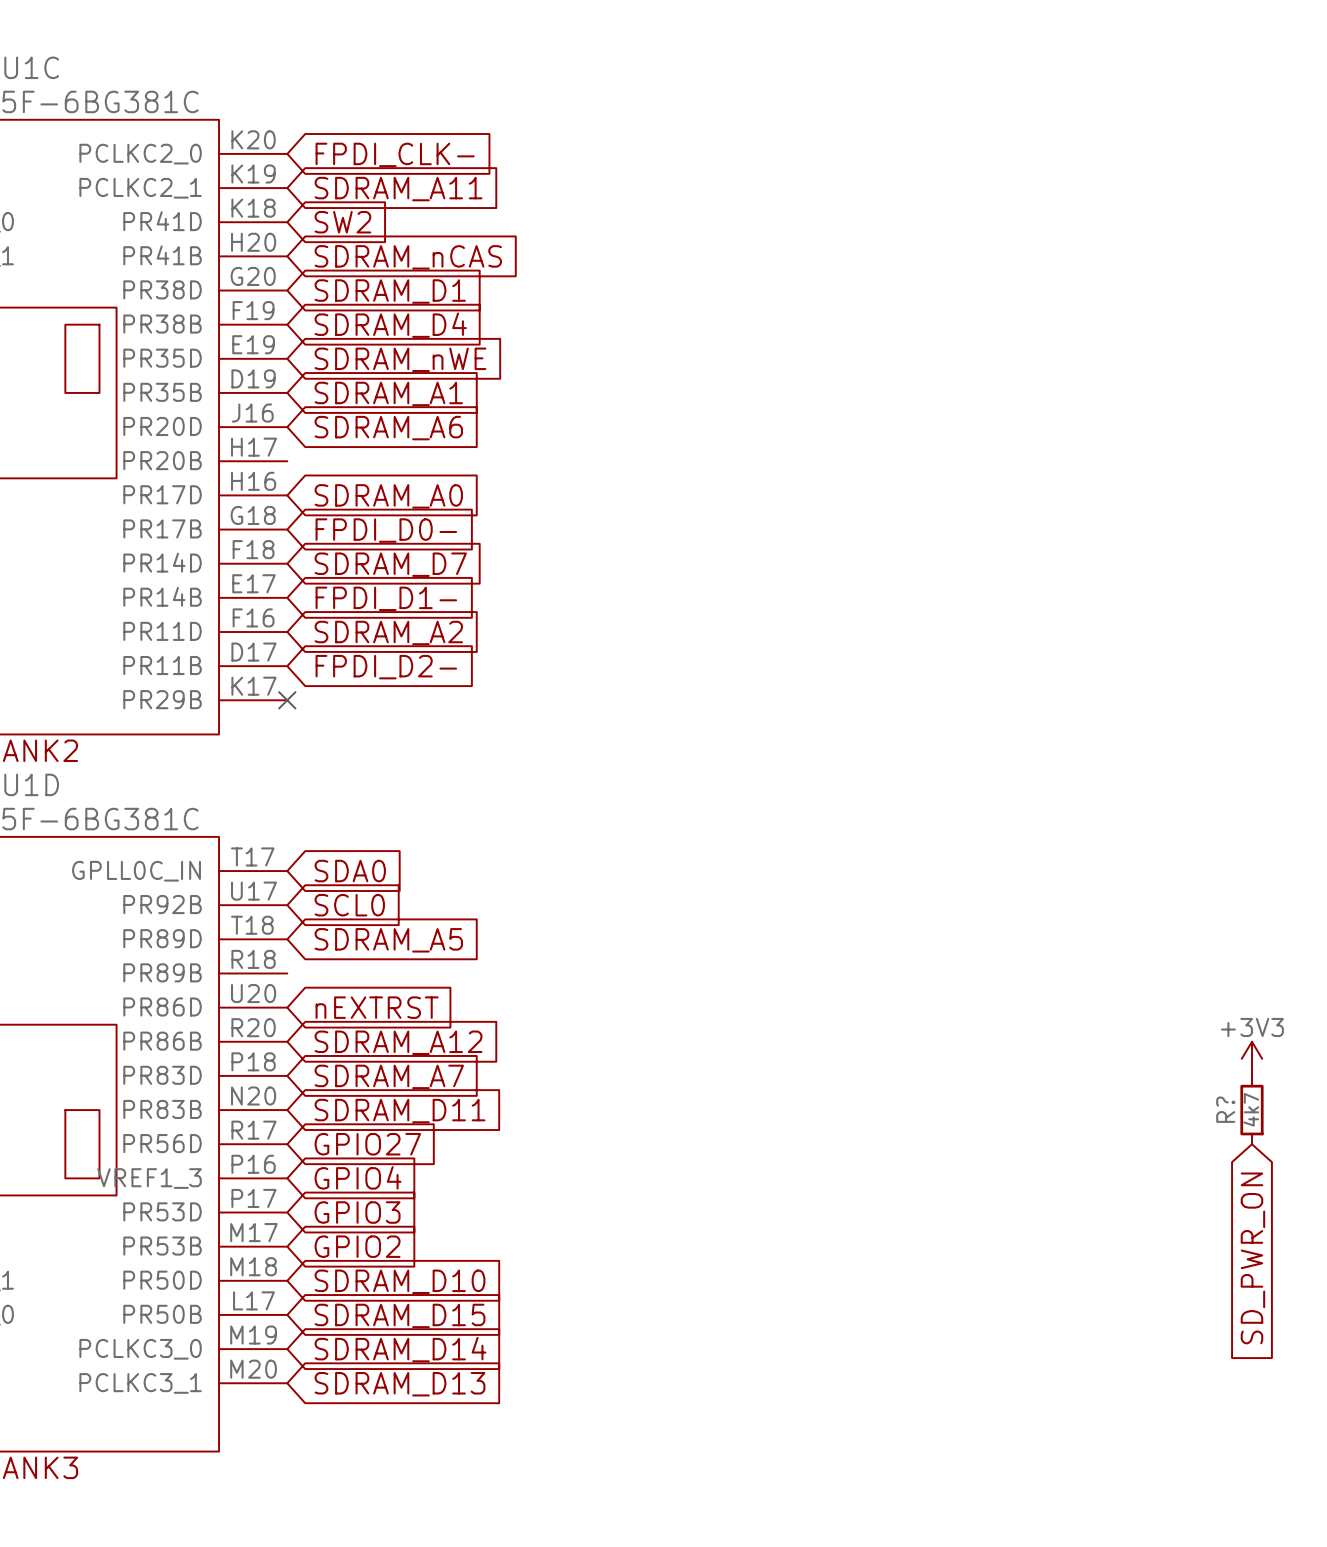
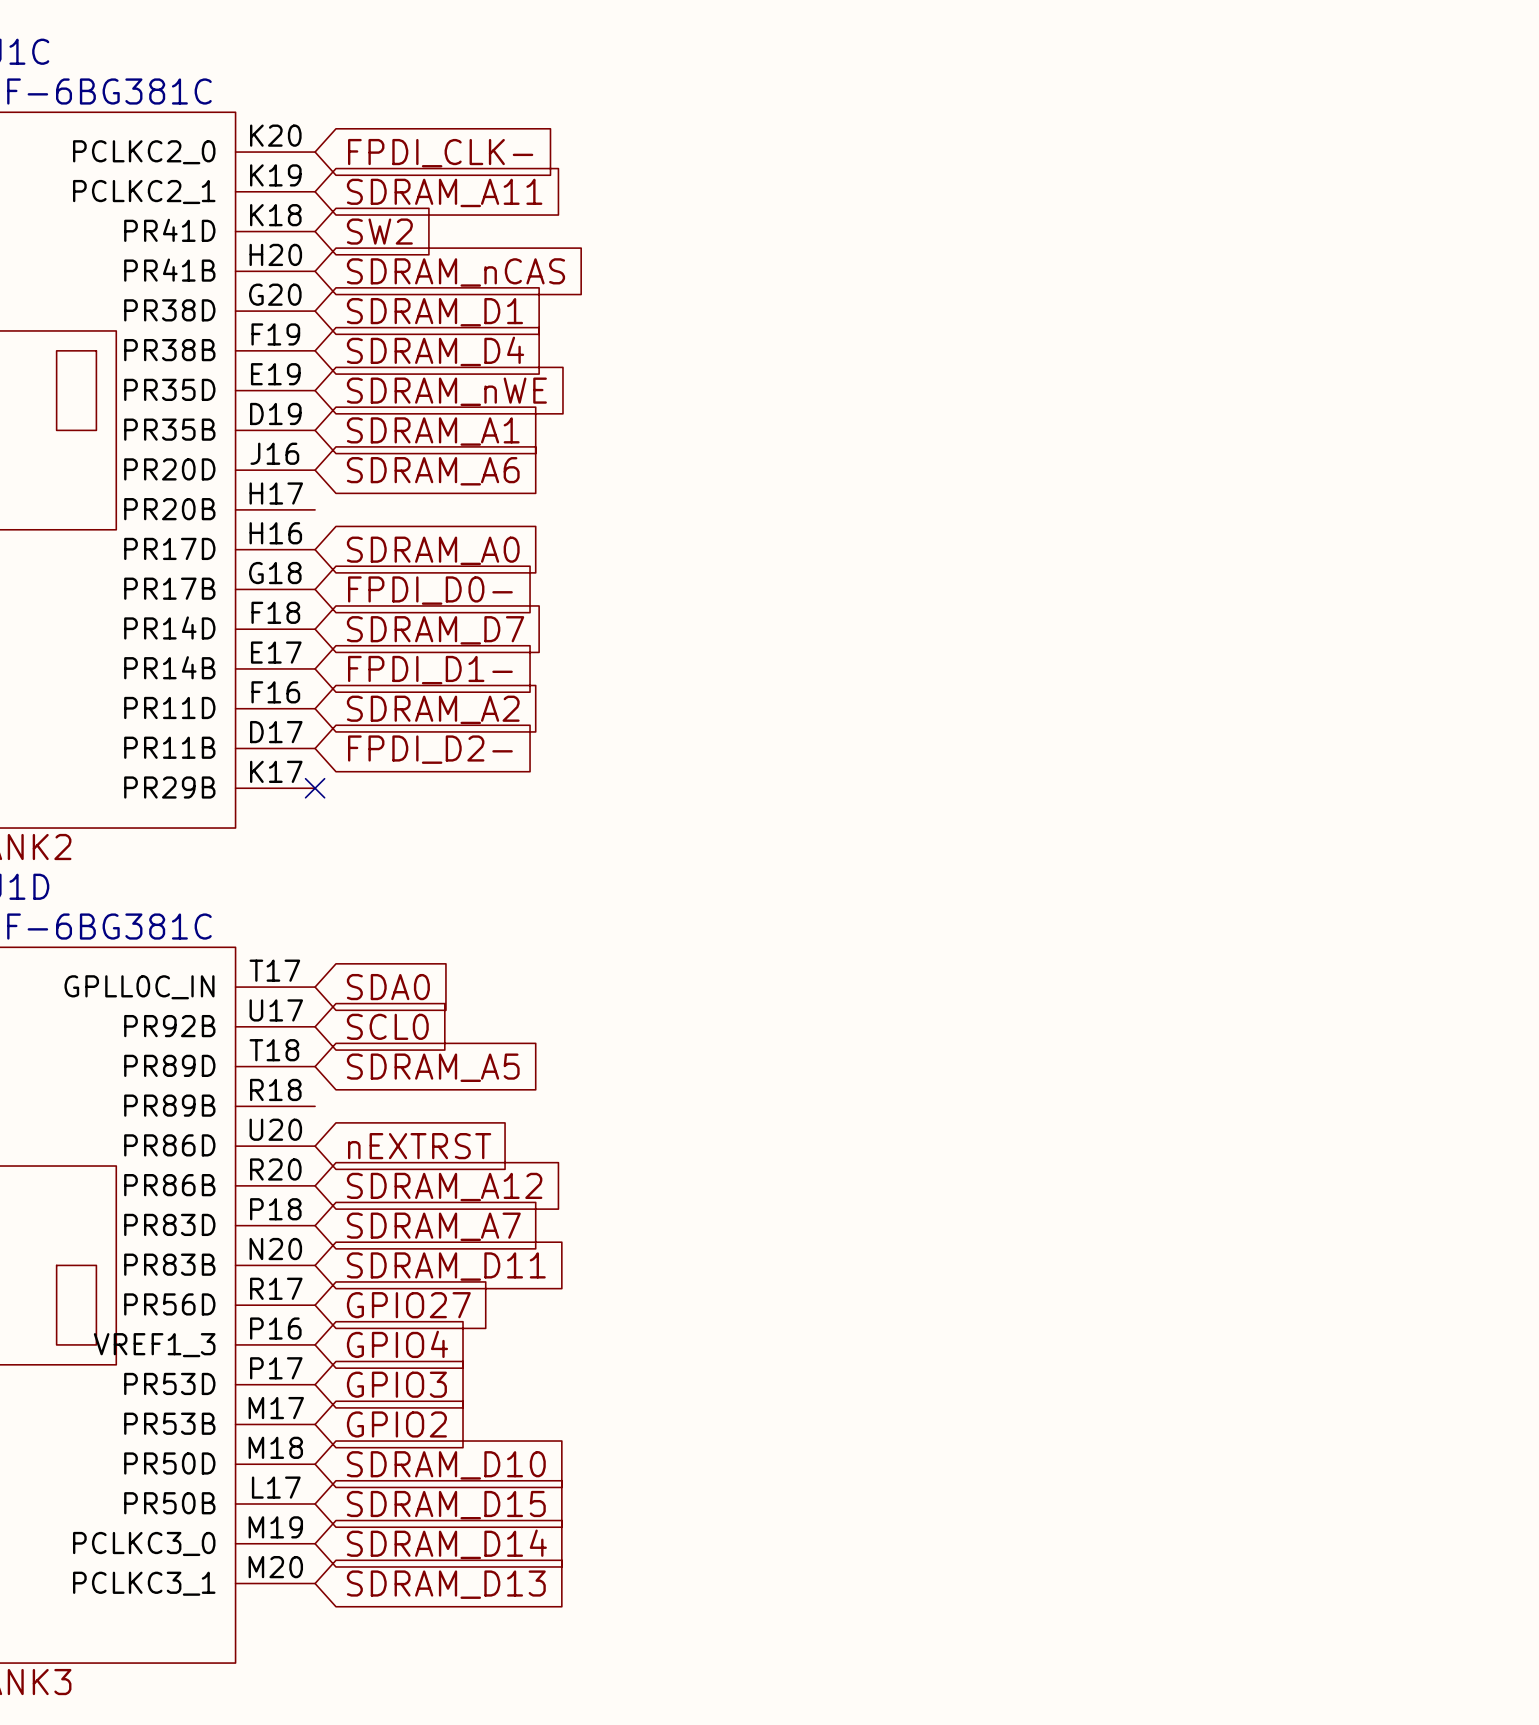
power symbol: +3V3 (1251, 1058) -> none
R?: 4k7 (1251, 1110) -> none
global label: SD_PWR_ON (1252, 1258) -> none

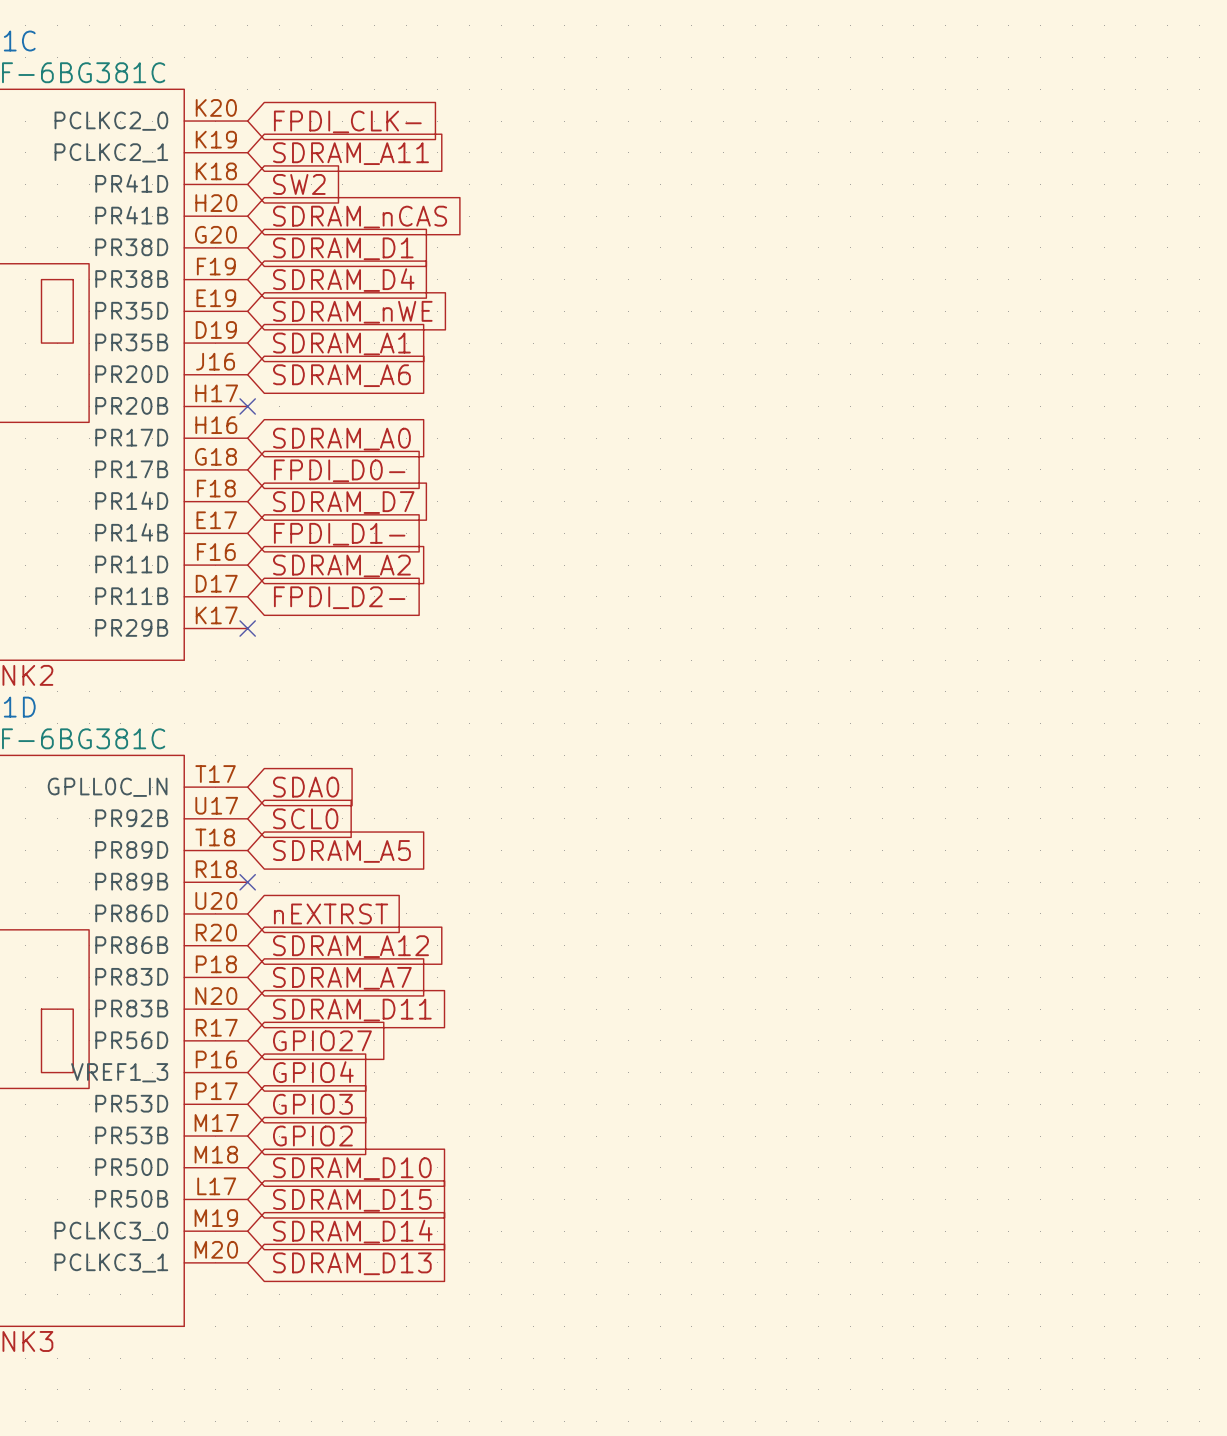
no-connect mark: none -> (247, 406)
no-connect mark: none -> (247, 882)

